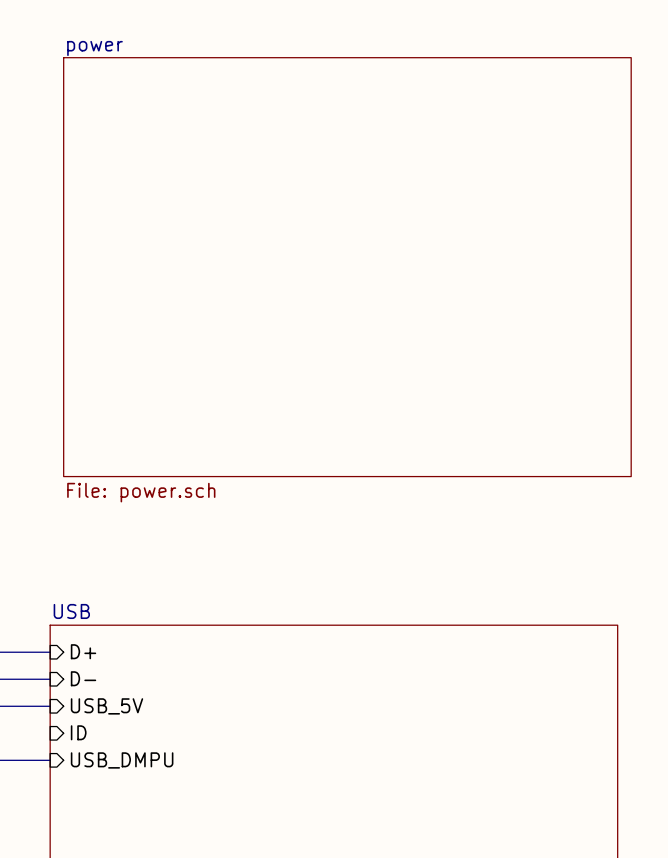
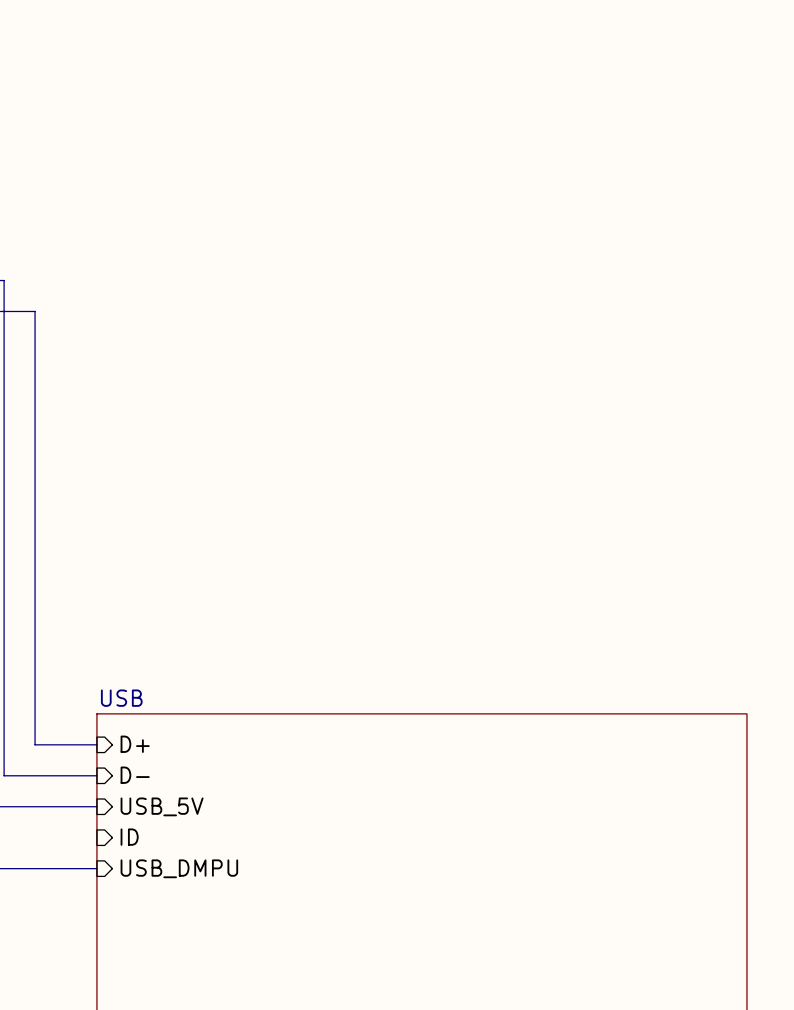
sheet power: File: power.sch (347, 267) -> none

